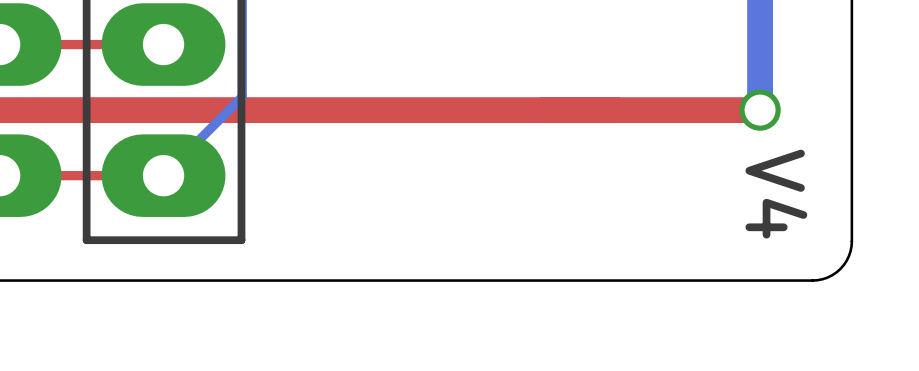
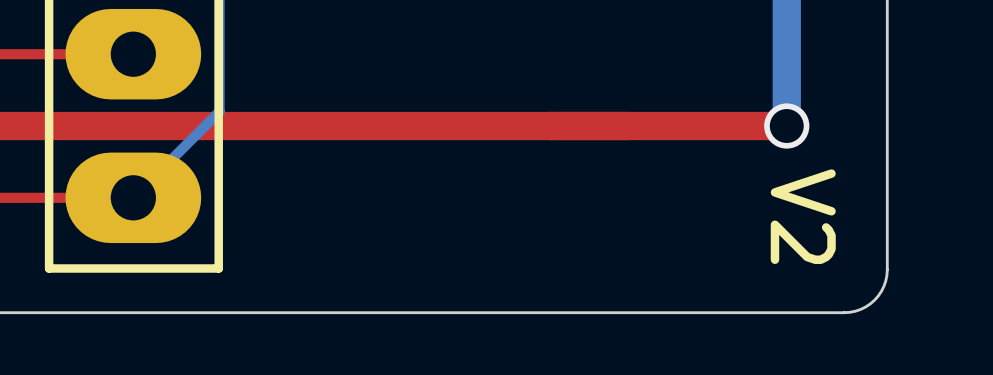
text: V4 (776, 194) -> V2 (803, 216)

